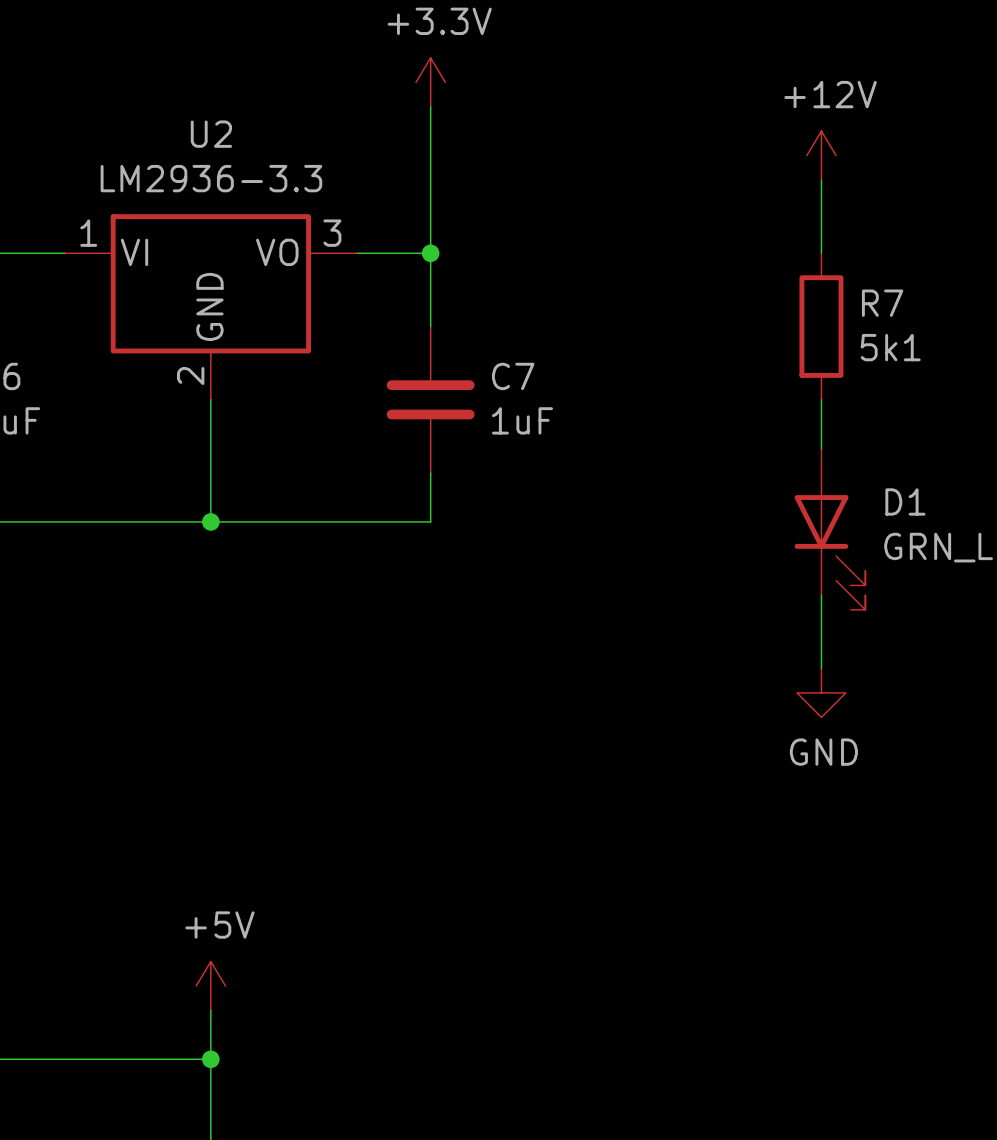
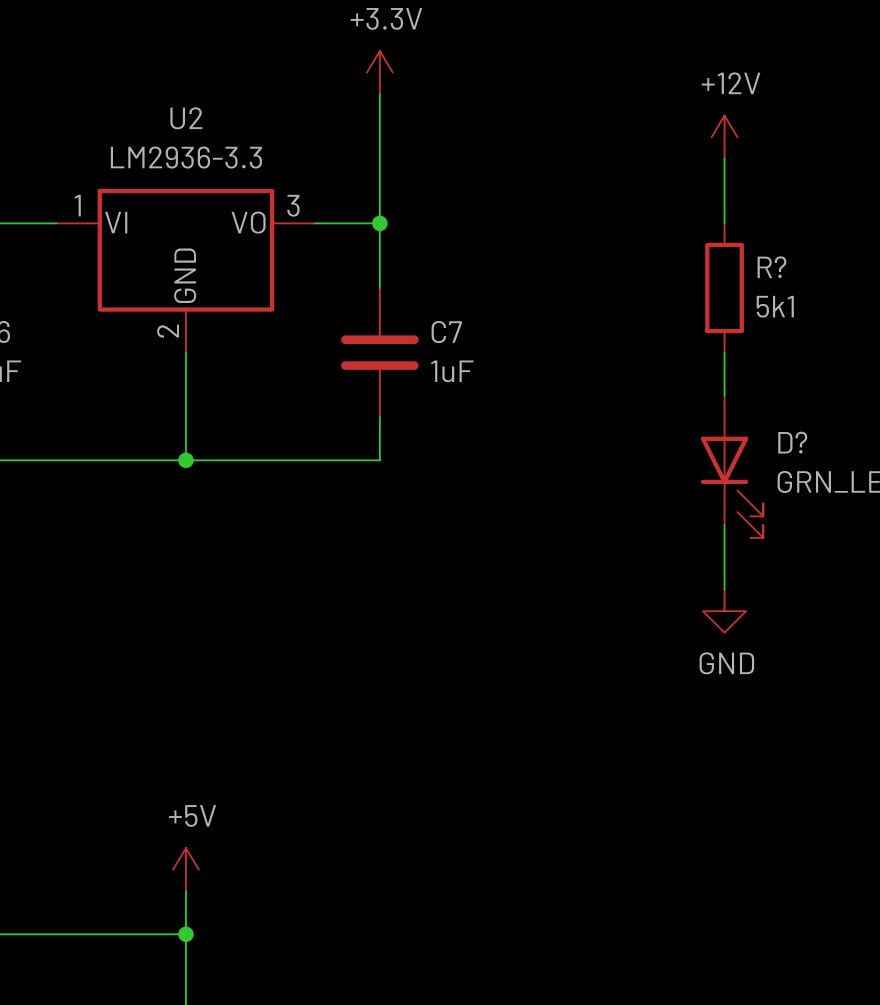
R7 name: R7 (882, 303) -> R? (771, 267)
D1 name: D1 (905, 501) -> D? (792, 442)

